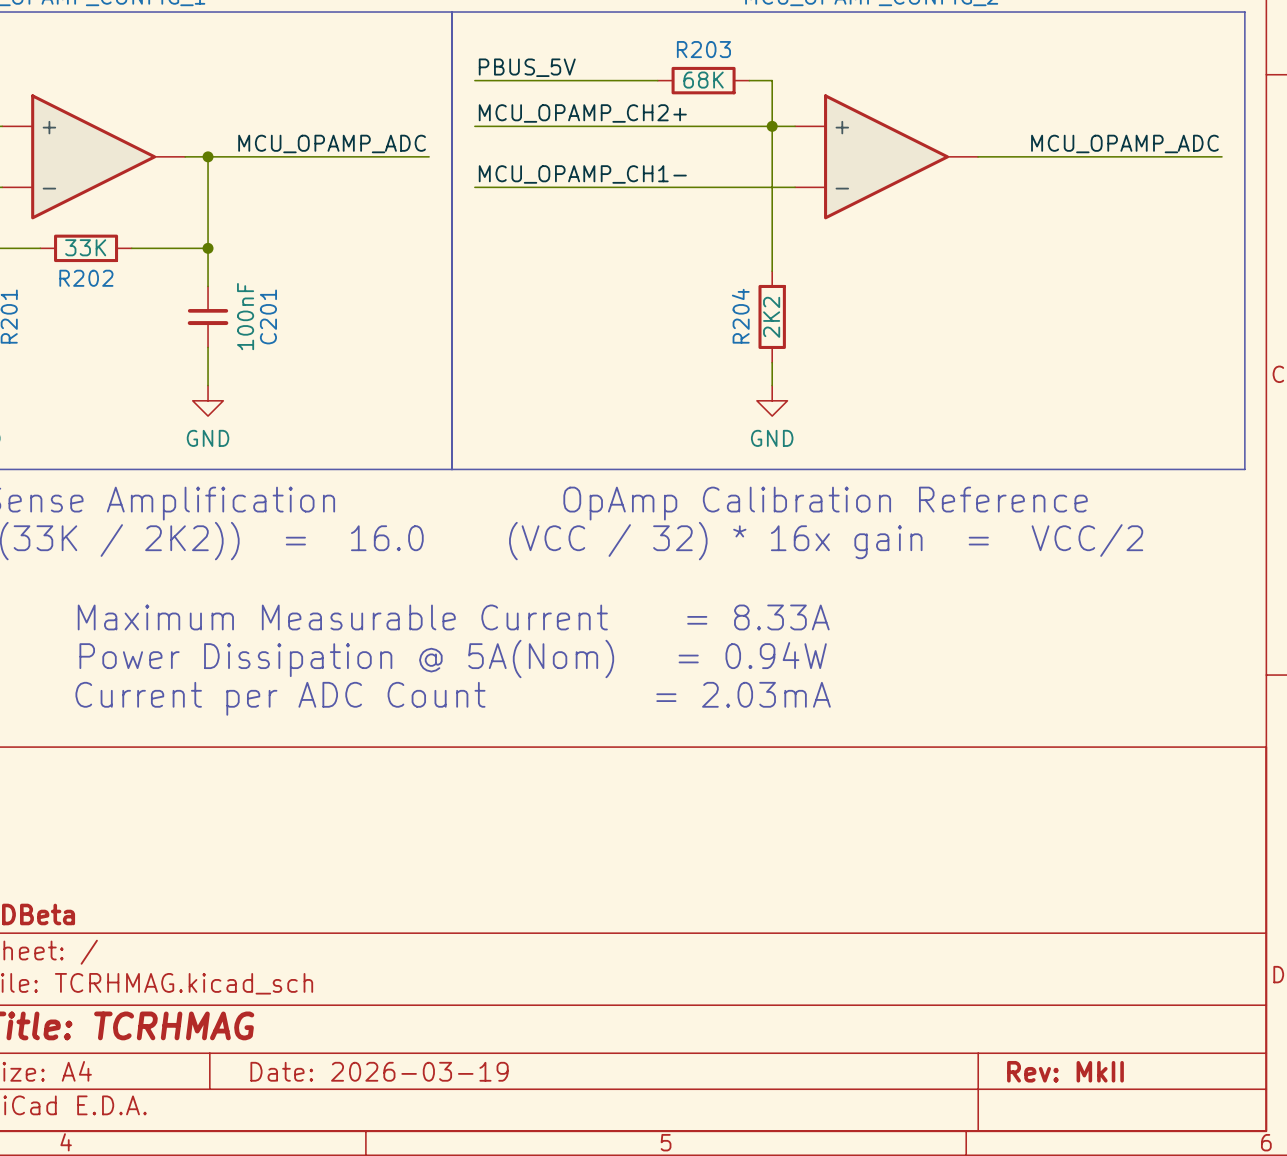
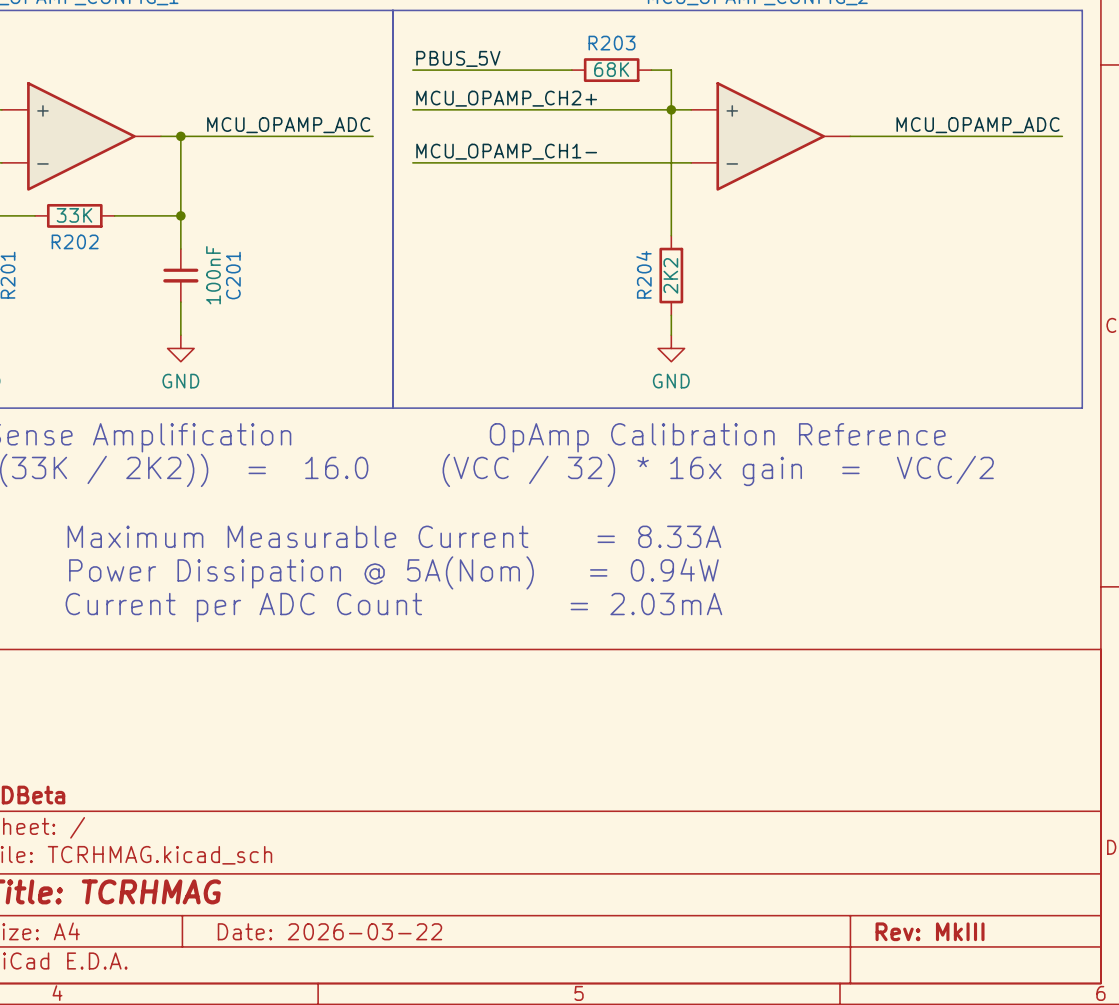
title block: Date: 2026-03-19 (379, 1071) -> Date: 2026-03-22 (329, 931)
title block: Rev: MkII (1065, 1071) -> Rev: MkIII (930, 931)

